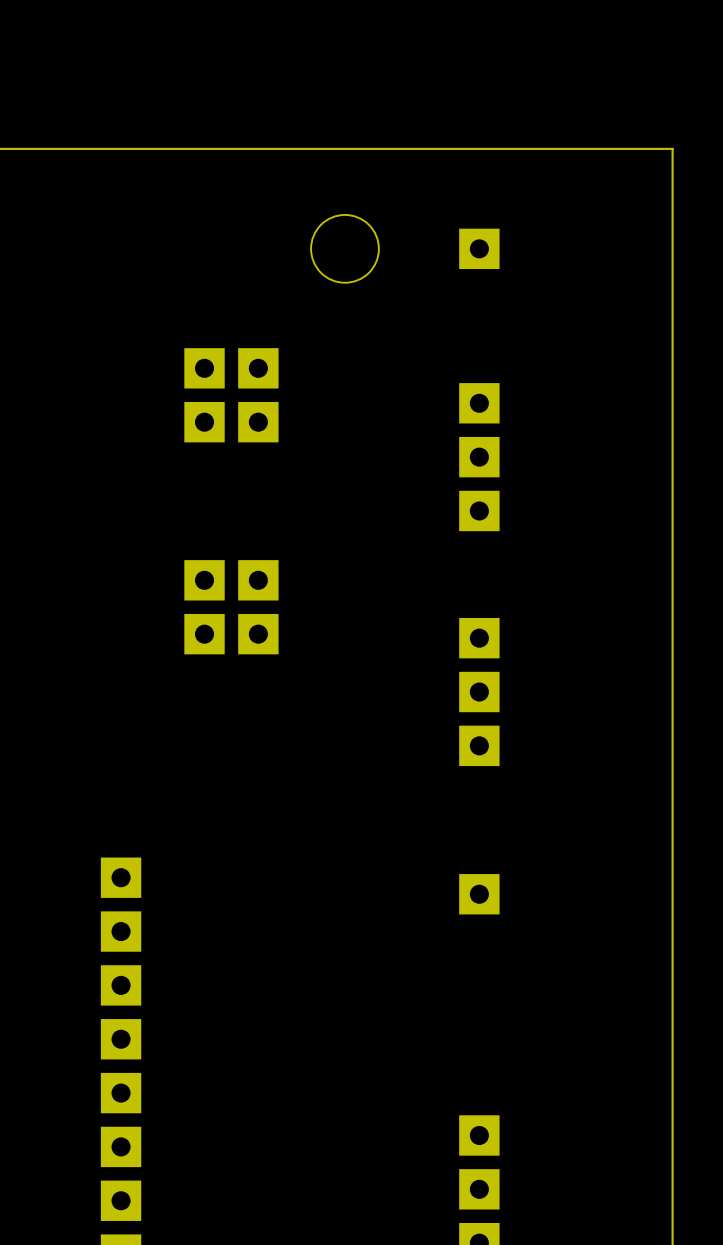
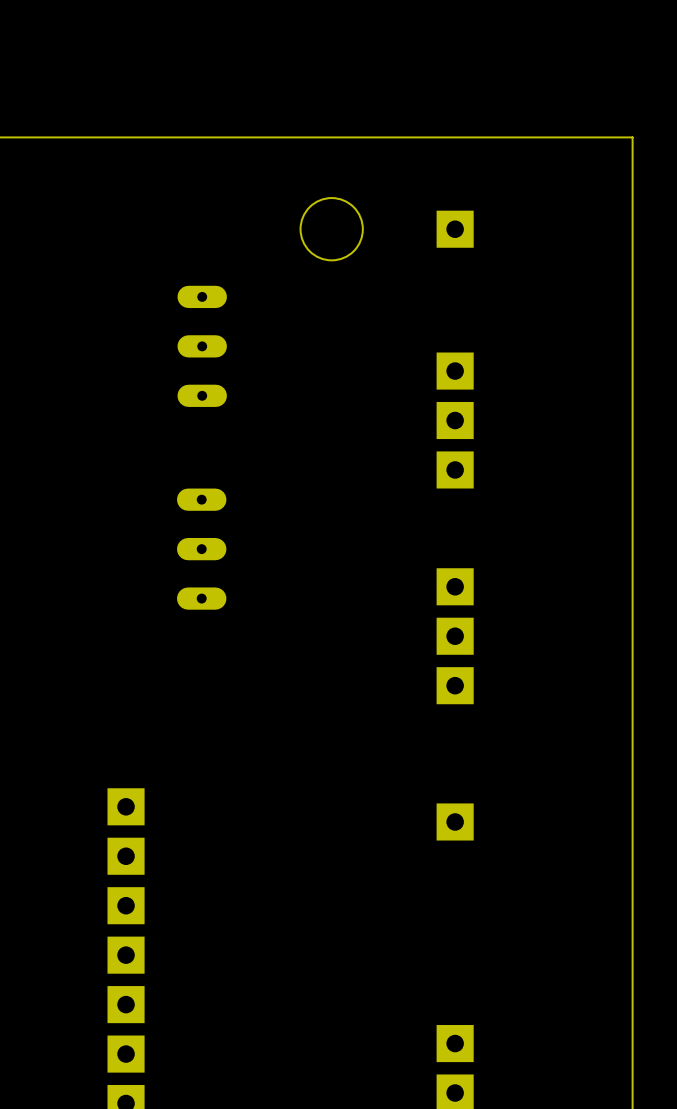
part: none -> (202, 346)
part: (231, 395) -> none
part: none -> (201, 549)
part: (231, 607) -> none

